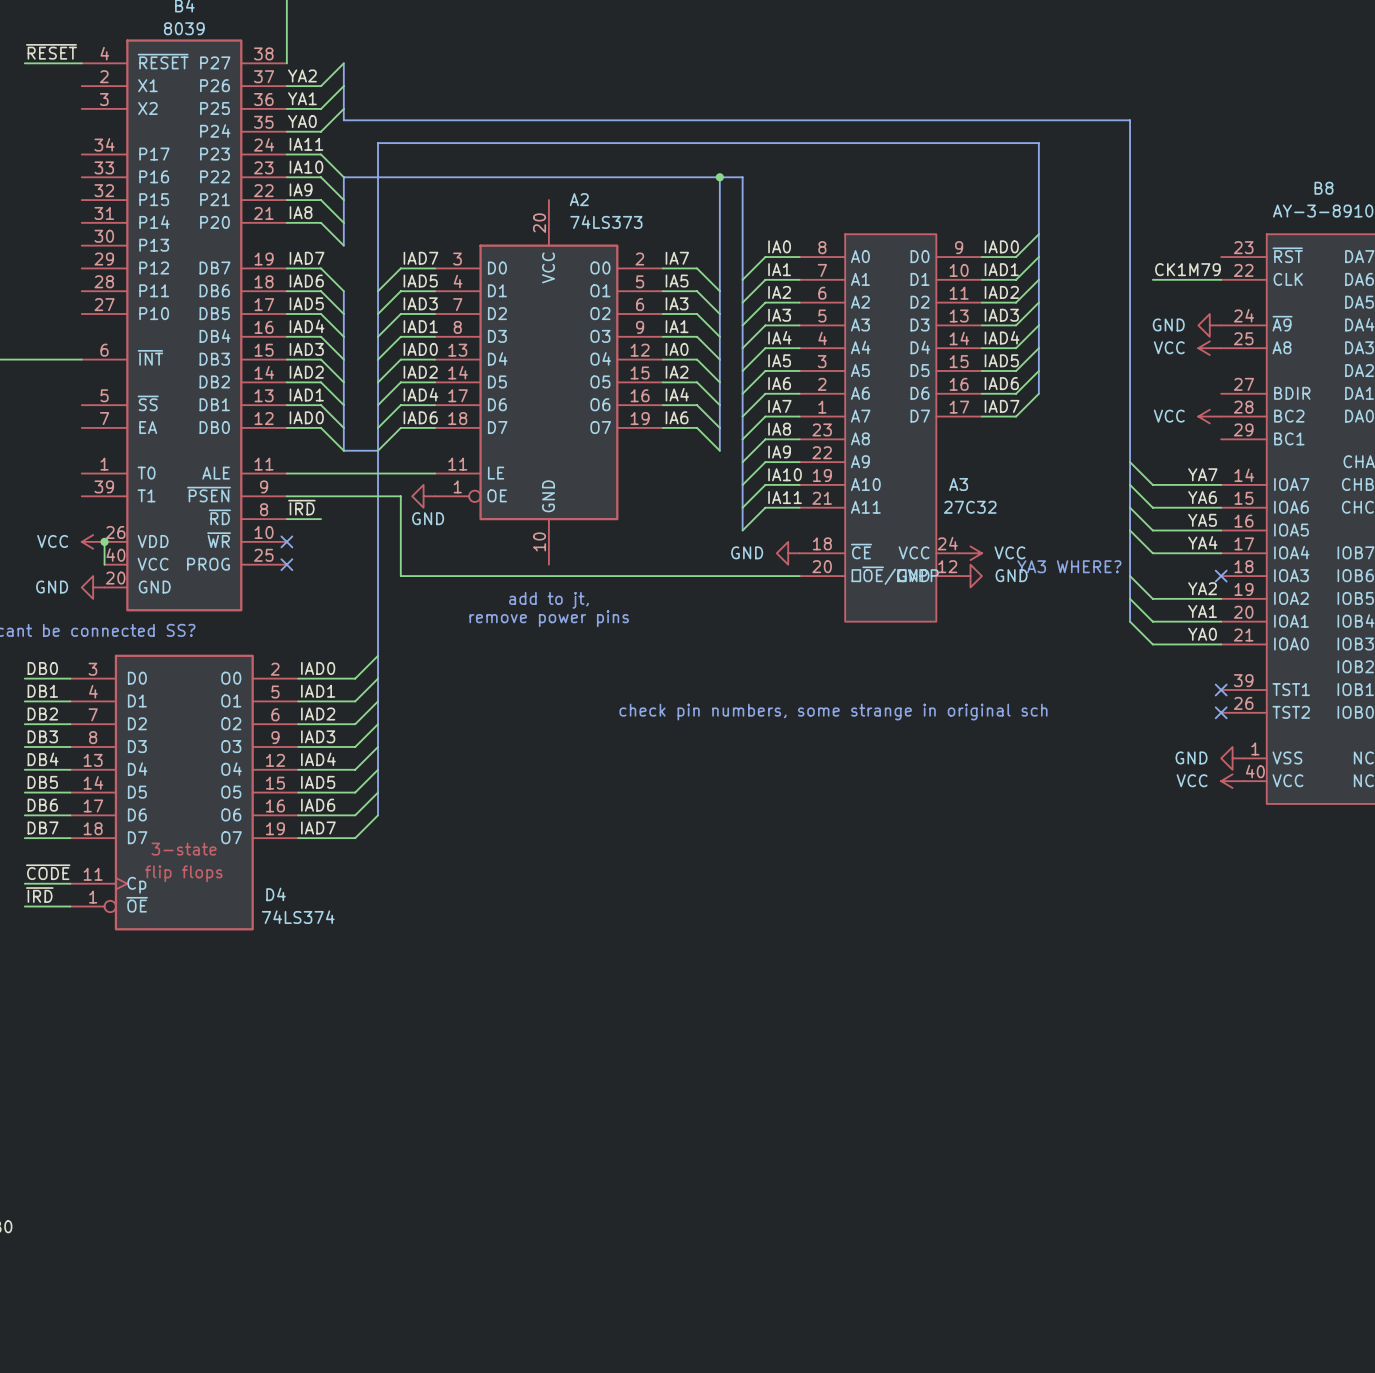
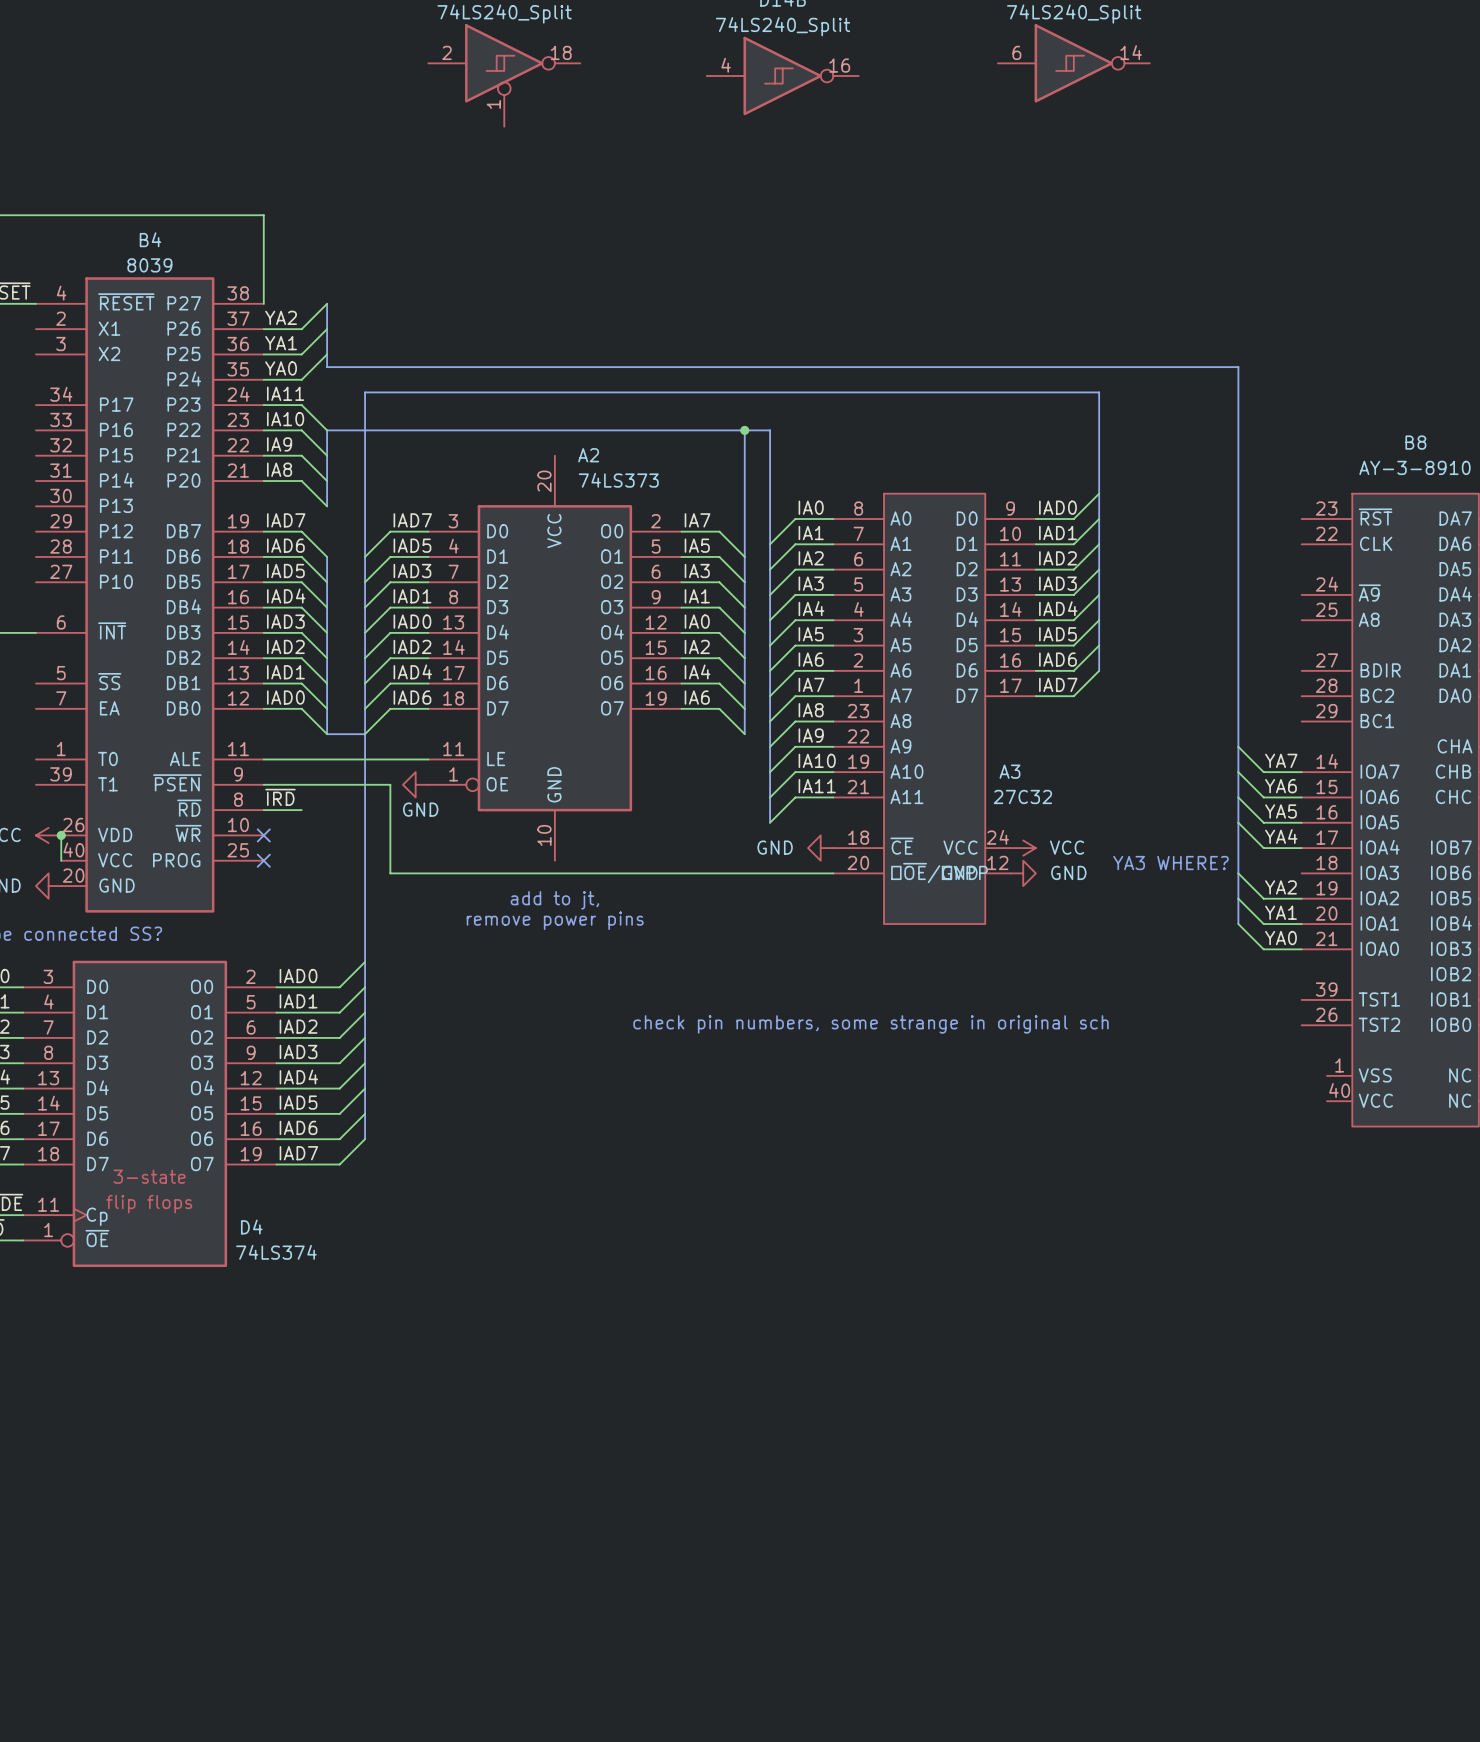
bus: (1130, 120) (1130, 621) -> (1200, 367) (1238, 367) (1238, 924)
label: CK1M79 (1187, 269) -> none
wire: (1152, 279) (1221, 279) -> none
power symbol: GND (1209, 325) -> none
power symbol: VCC (1209, 348) -> none
power symbol: VCC (1209, 416) -> none
wire: (1130, 462) (1152, 484) (1187, 484) -> (1238, 746) (1263, 772)
wire: (1130, 484) (1152, 507) (1187, 507) -> (1238, 772) (1263, 797)
wire: (1130, 507) (1152, 530) (1187, 530) -> (1238, 797) (1263, 822)
wire: (1130, 530) (1152, 553) (1187, 553) -> (1238, 822) (1263, 848)
text position: YA3 WHERE? (1069, 566) -> YA3 WHERE? (1170, 863)
wire: (1130, 576) (1152, 598) (1187, 598) -> (1238, 873) (1263, 898)
no-connect mark: (1221, 576) -> none
wire: (1130, 598) (1152, 621) (1187, 621) -> (1238, 898) (1263, 924)
wire: (1130, 621) (1152, 644) (1187, 644) -> (1238, 924) (1263, 949)
no-connect mark: (1221, 690) -> none
no-connect mark: (1221, 712) -> none
power symbol: GND (1232, 758) -> none
power symbol: VCC (1232, 781) -> none

